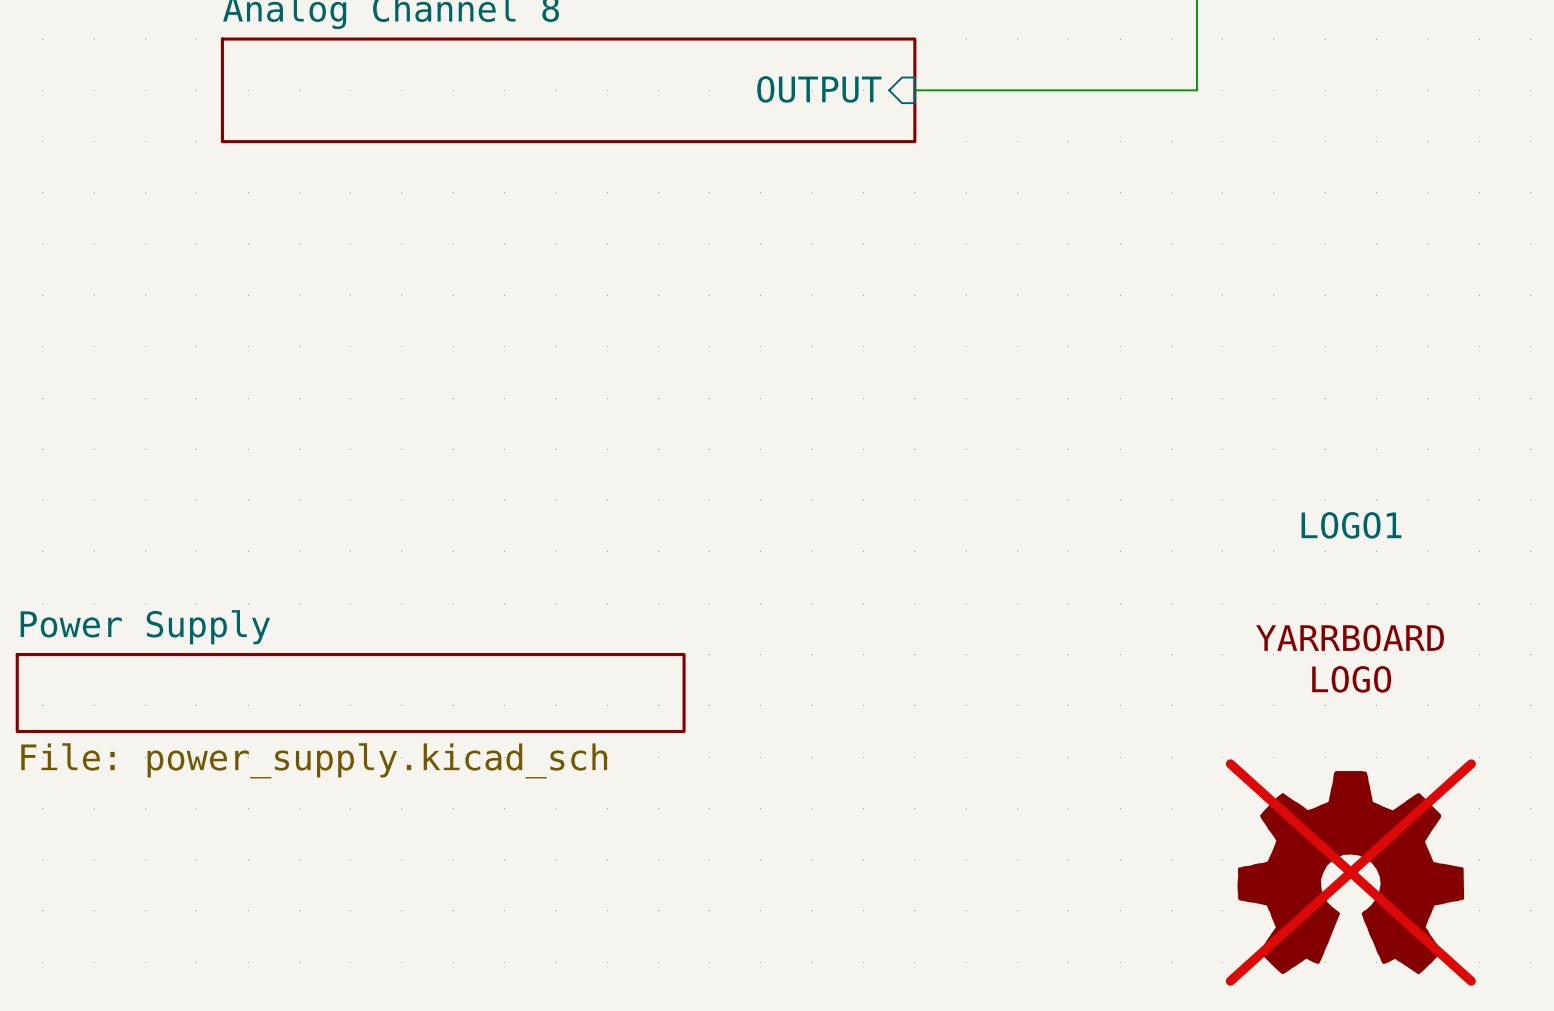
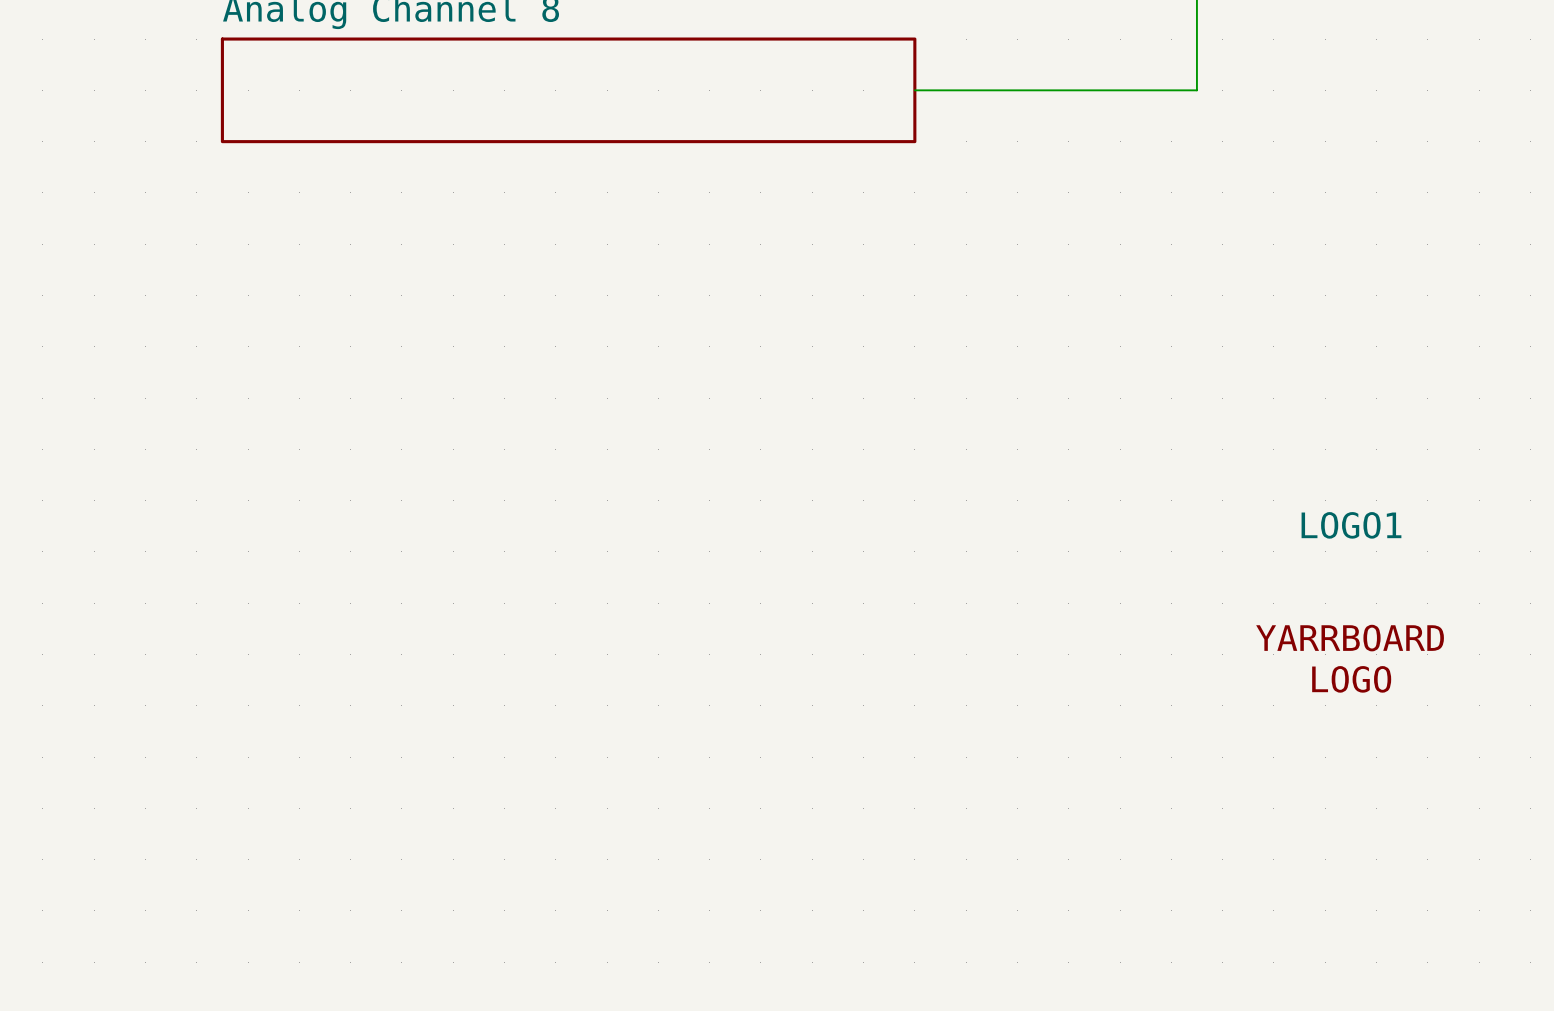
sheet pin: OUTPUT (819, 89) -> none
sheet Power Supply: File: power_supply.kicad_sch (350, 693) -> none
part: (1350, 872) -> none

